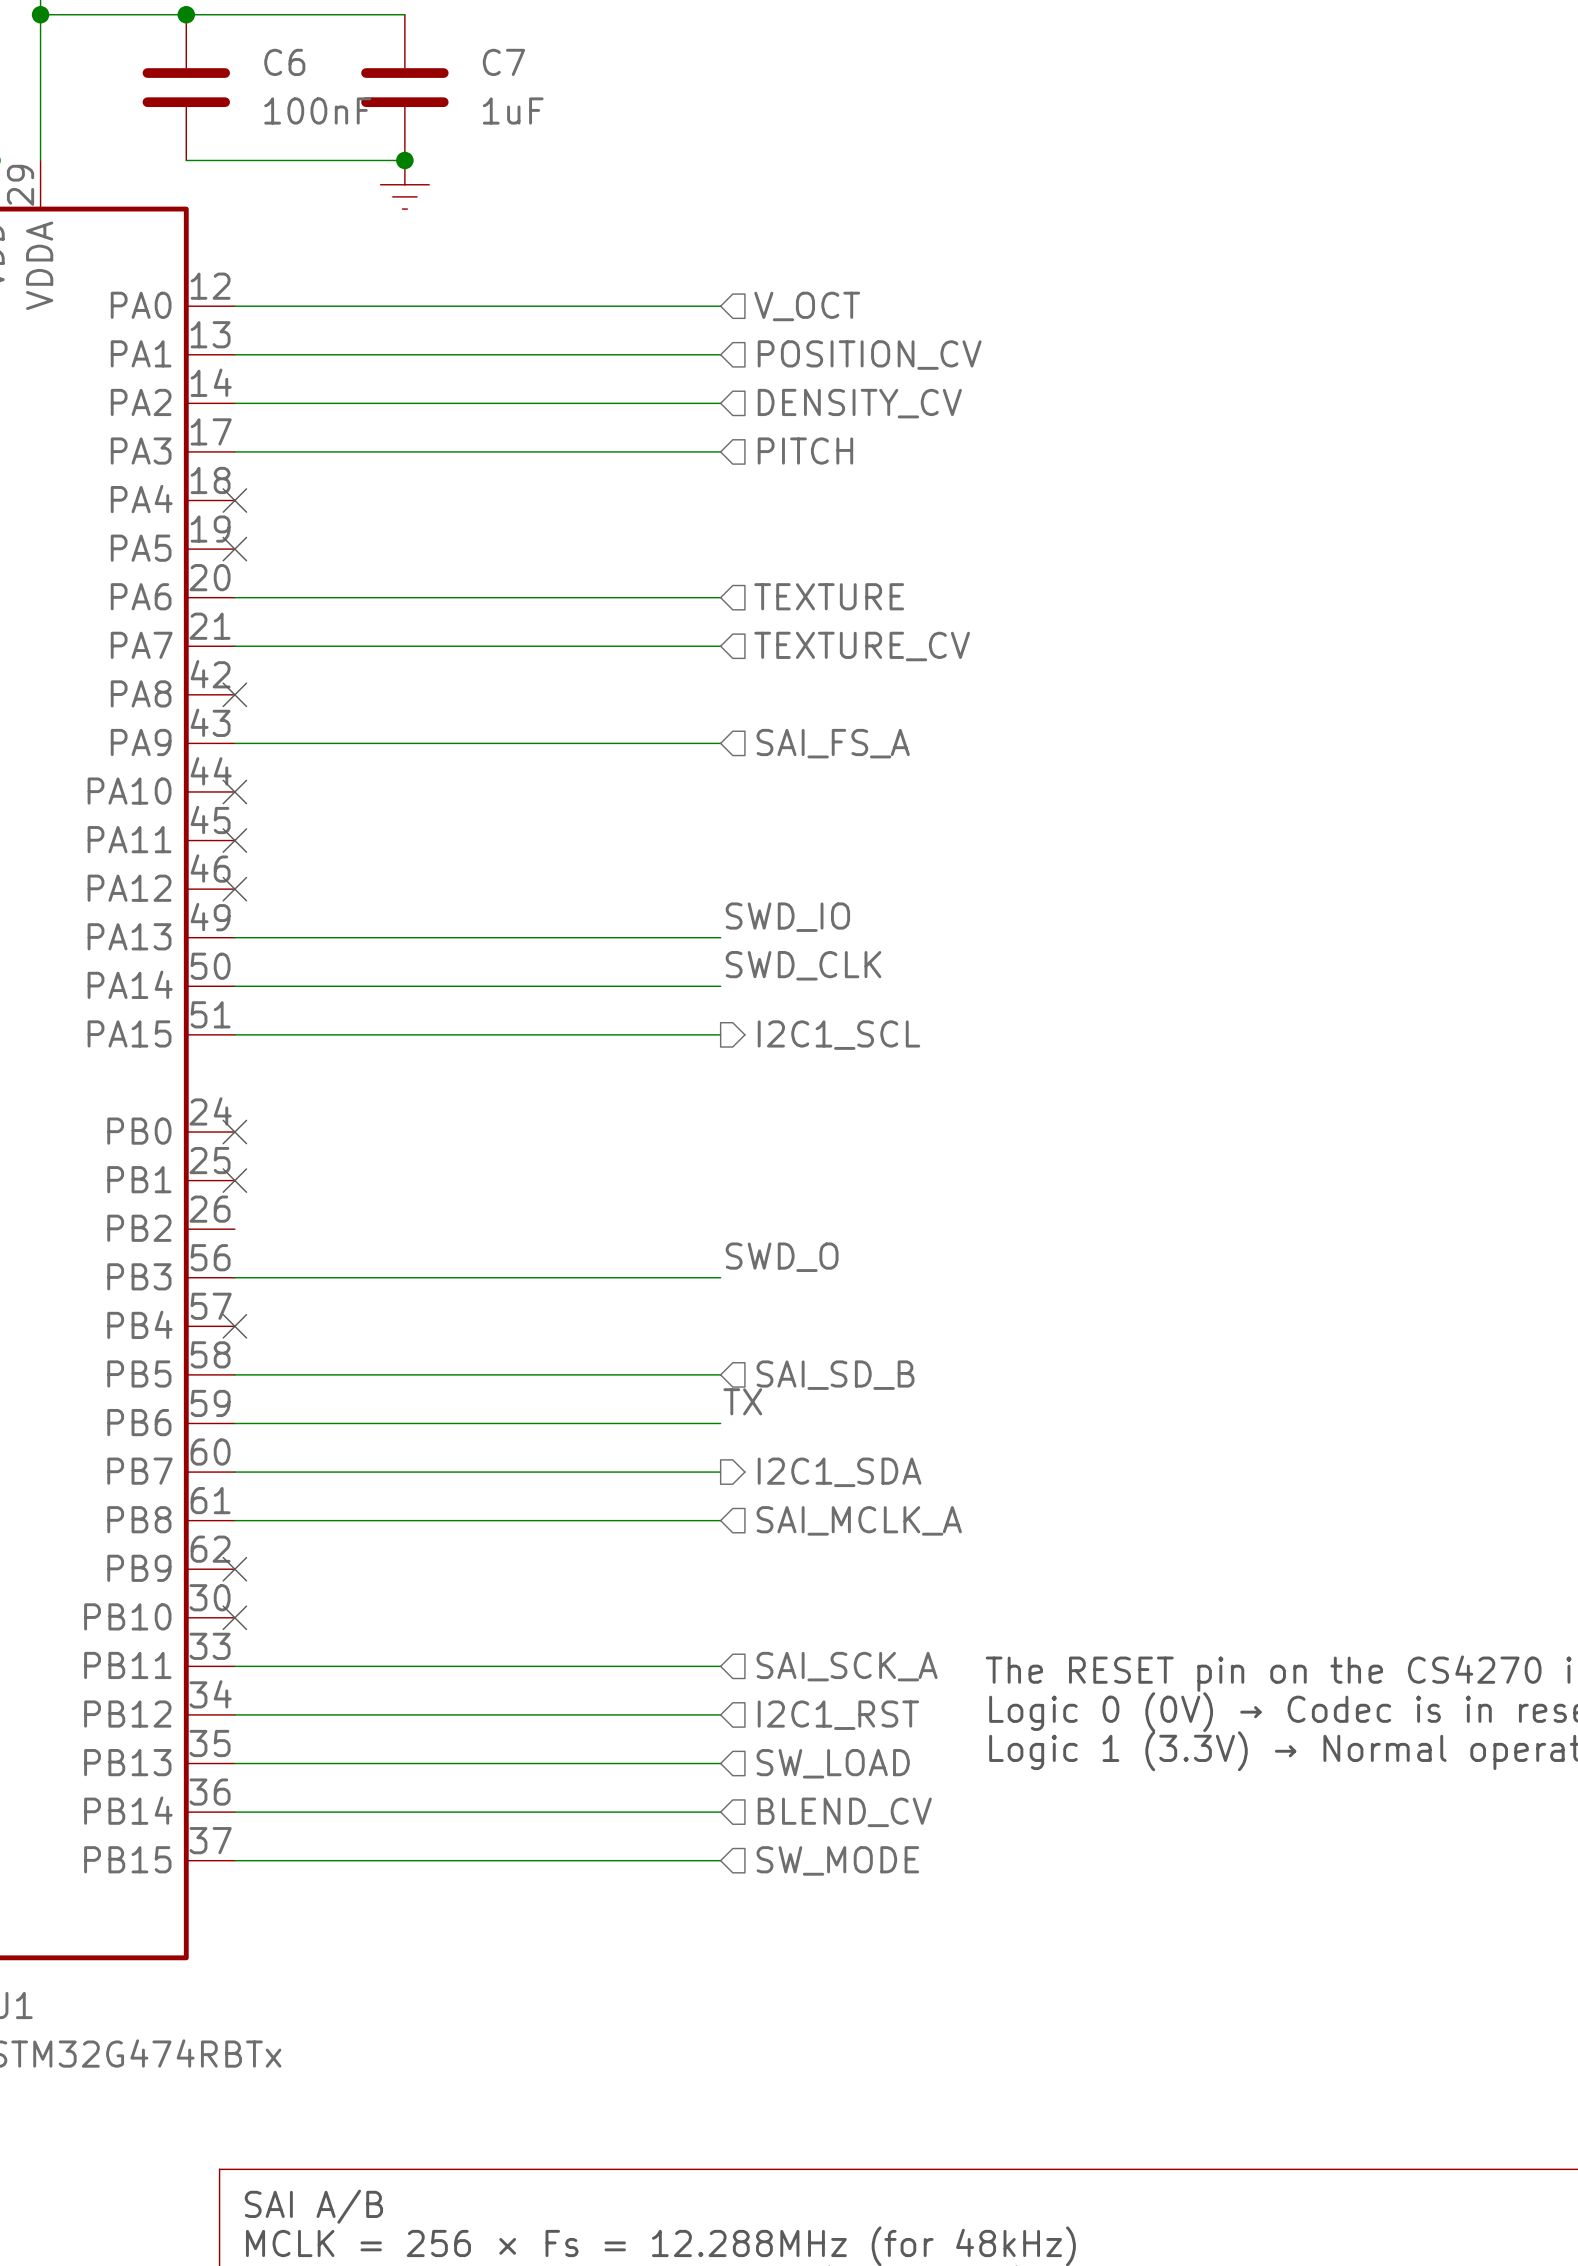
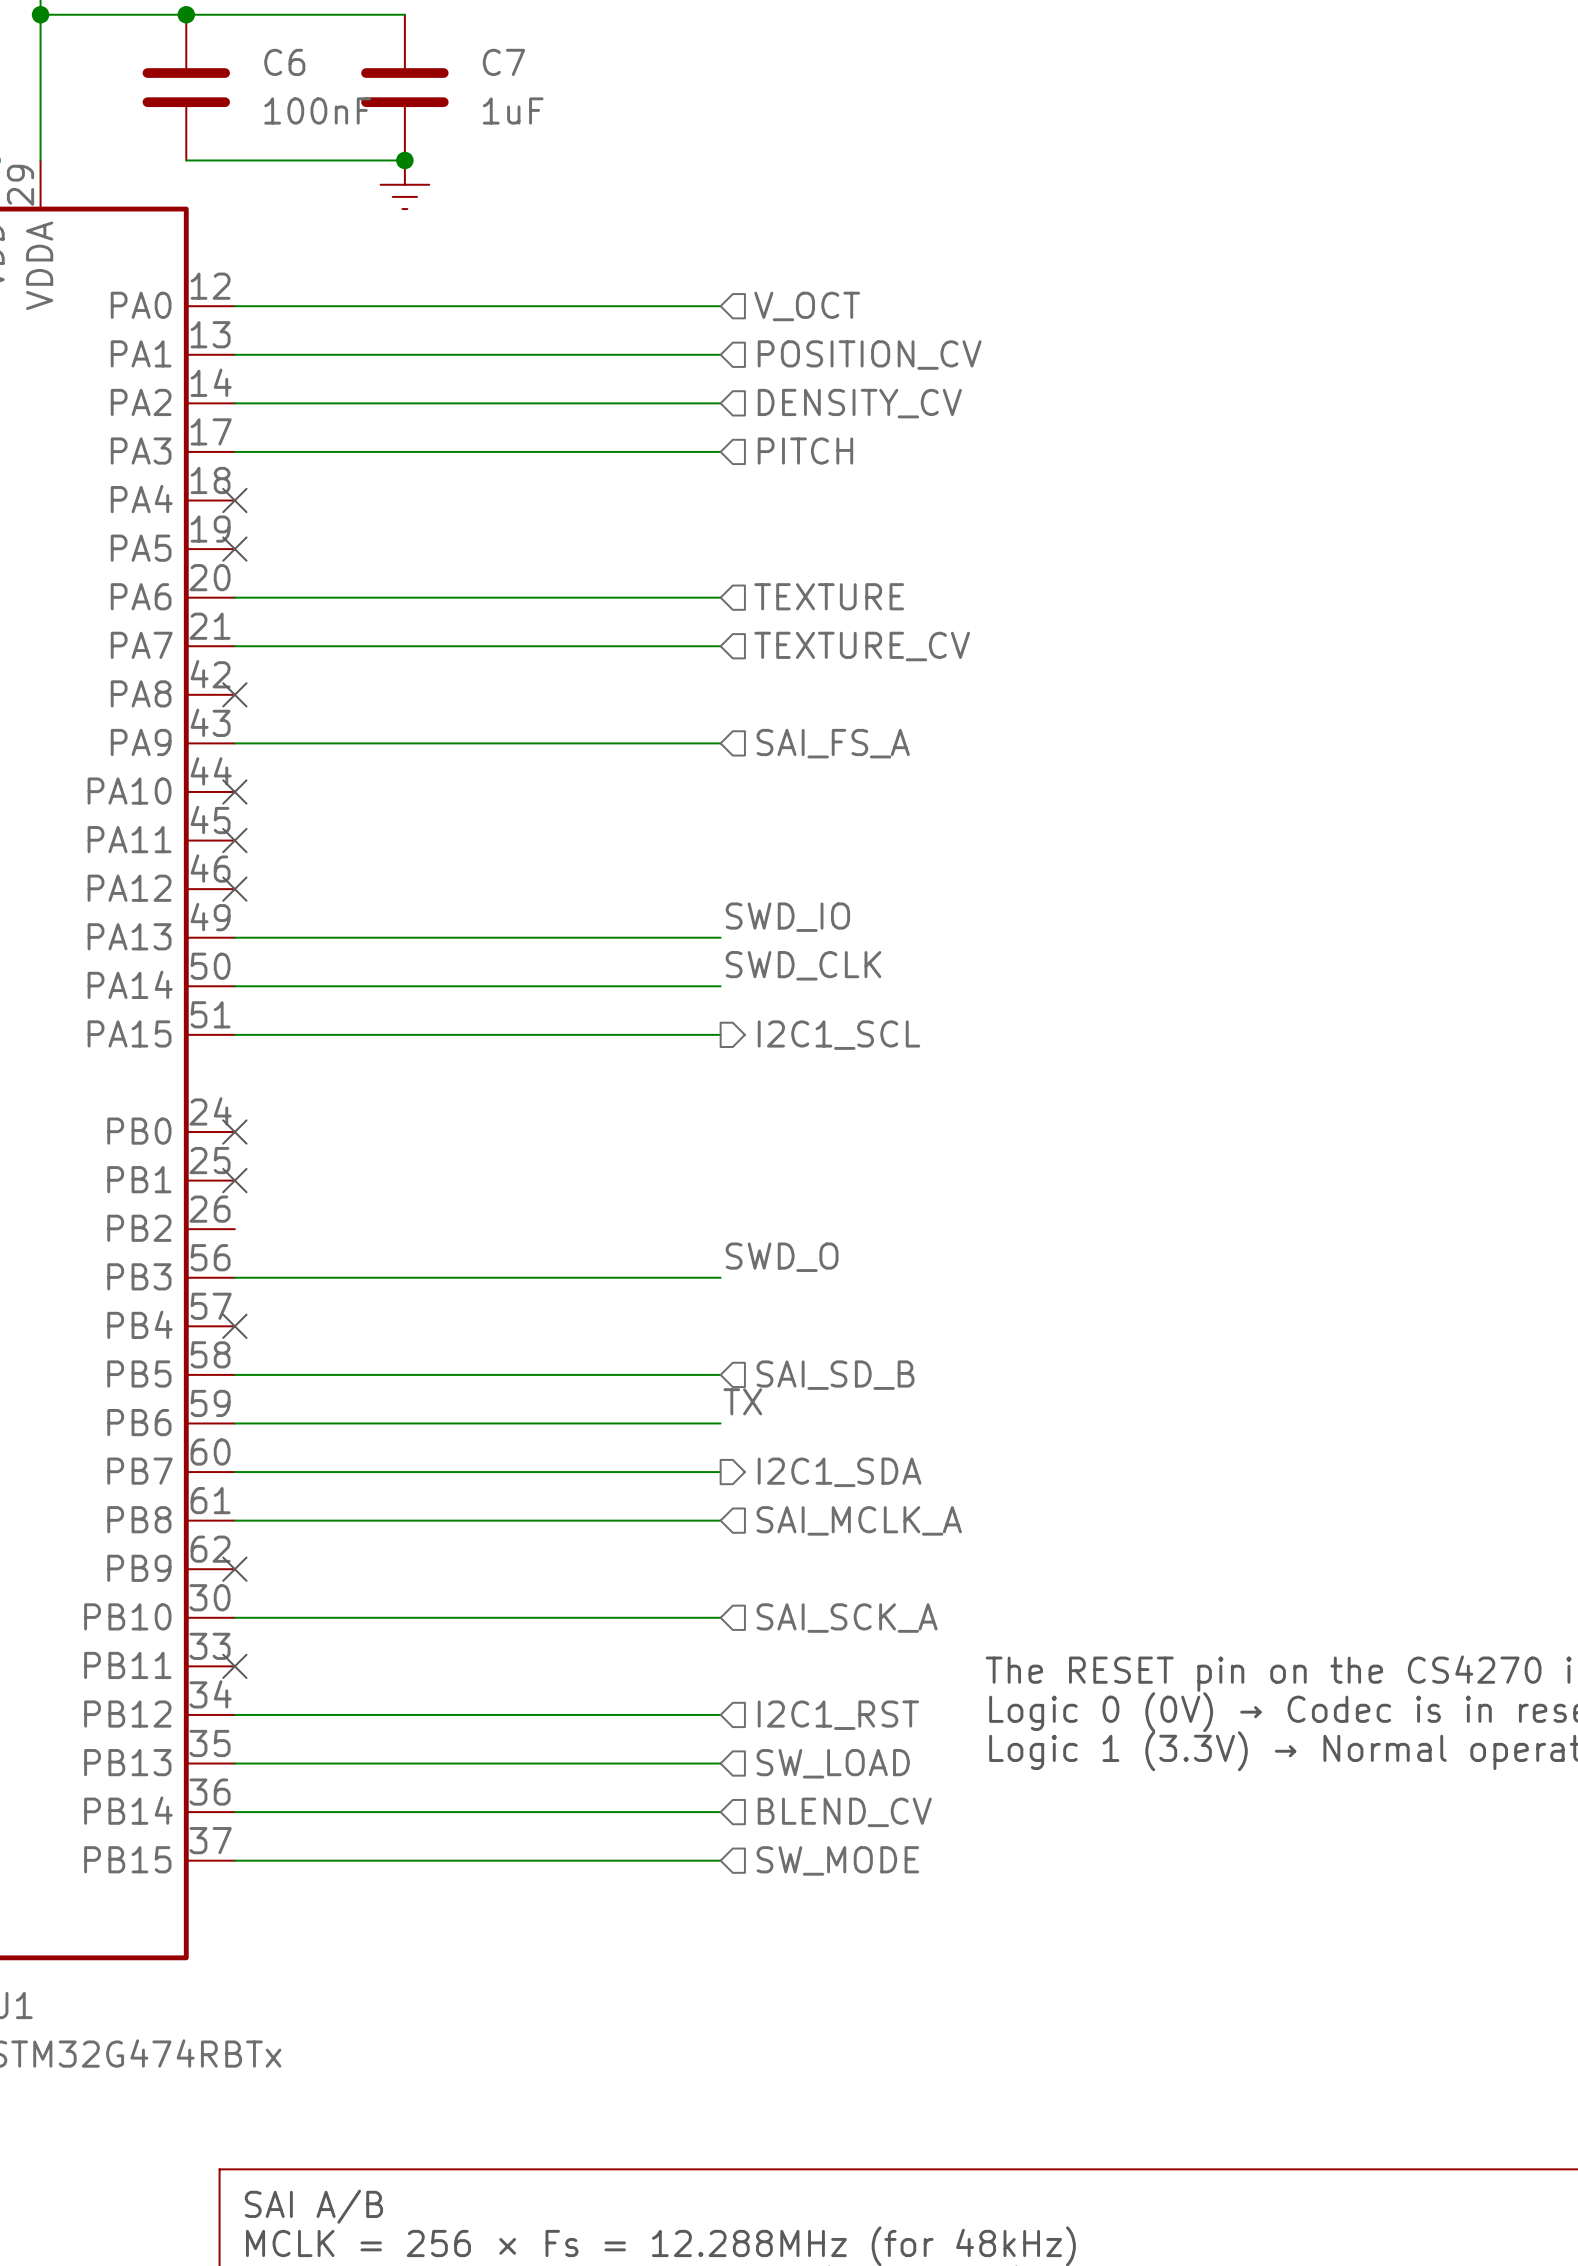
no-connect mark position: (234, 1617) -> (234, 1666)
wire: (234, 1666) (720, 1666) -> (234, 1617) (720, 1617)
hierarchical label position: SAI_SCK_A (847, 1666) -> SAI_SCK_A (847, 1618)

